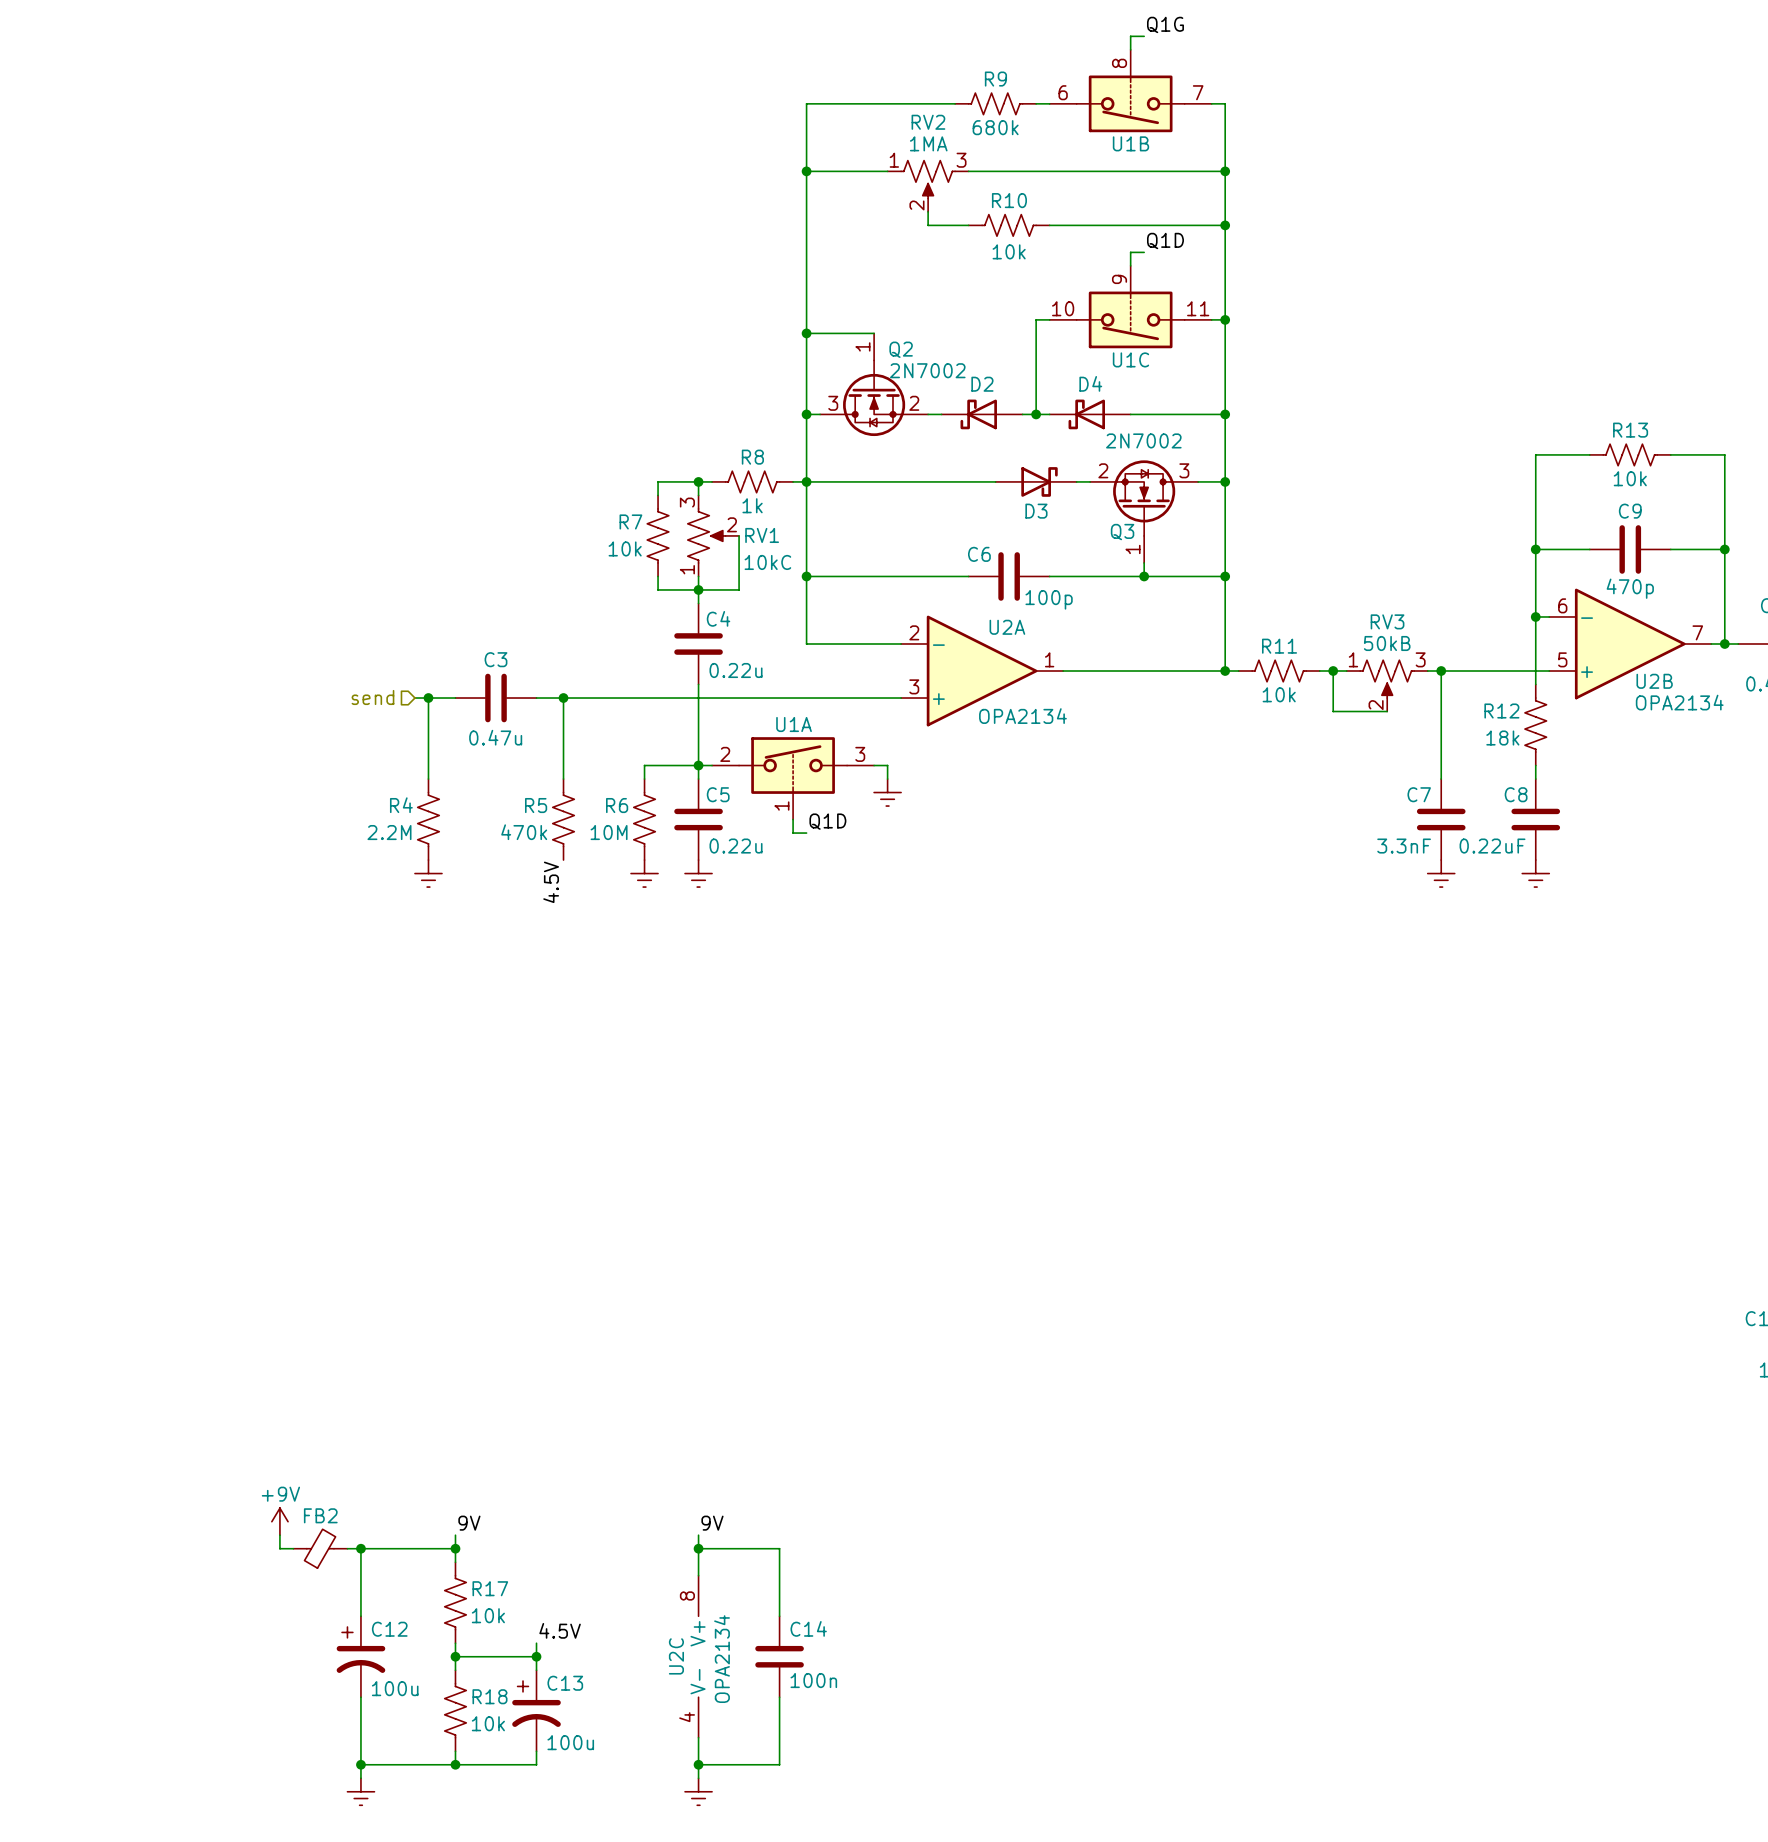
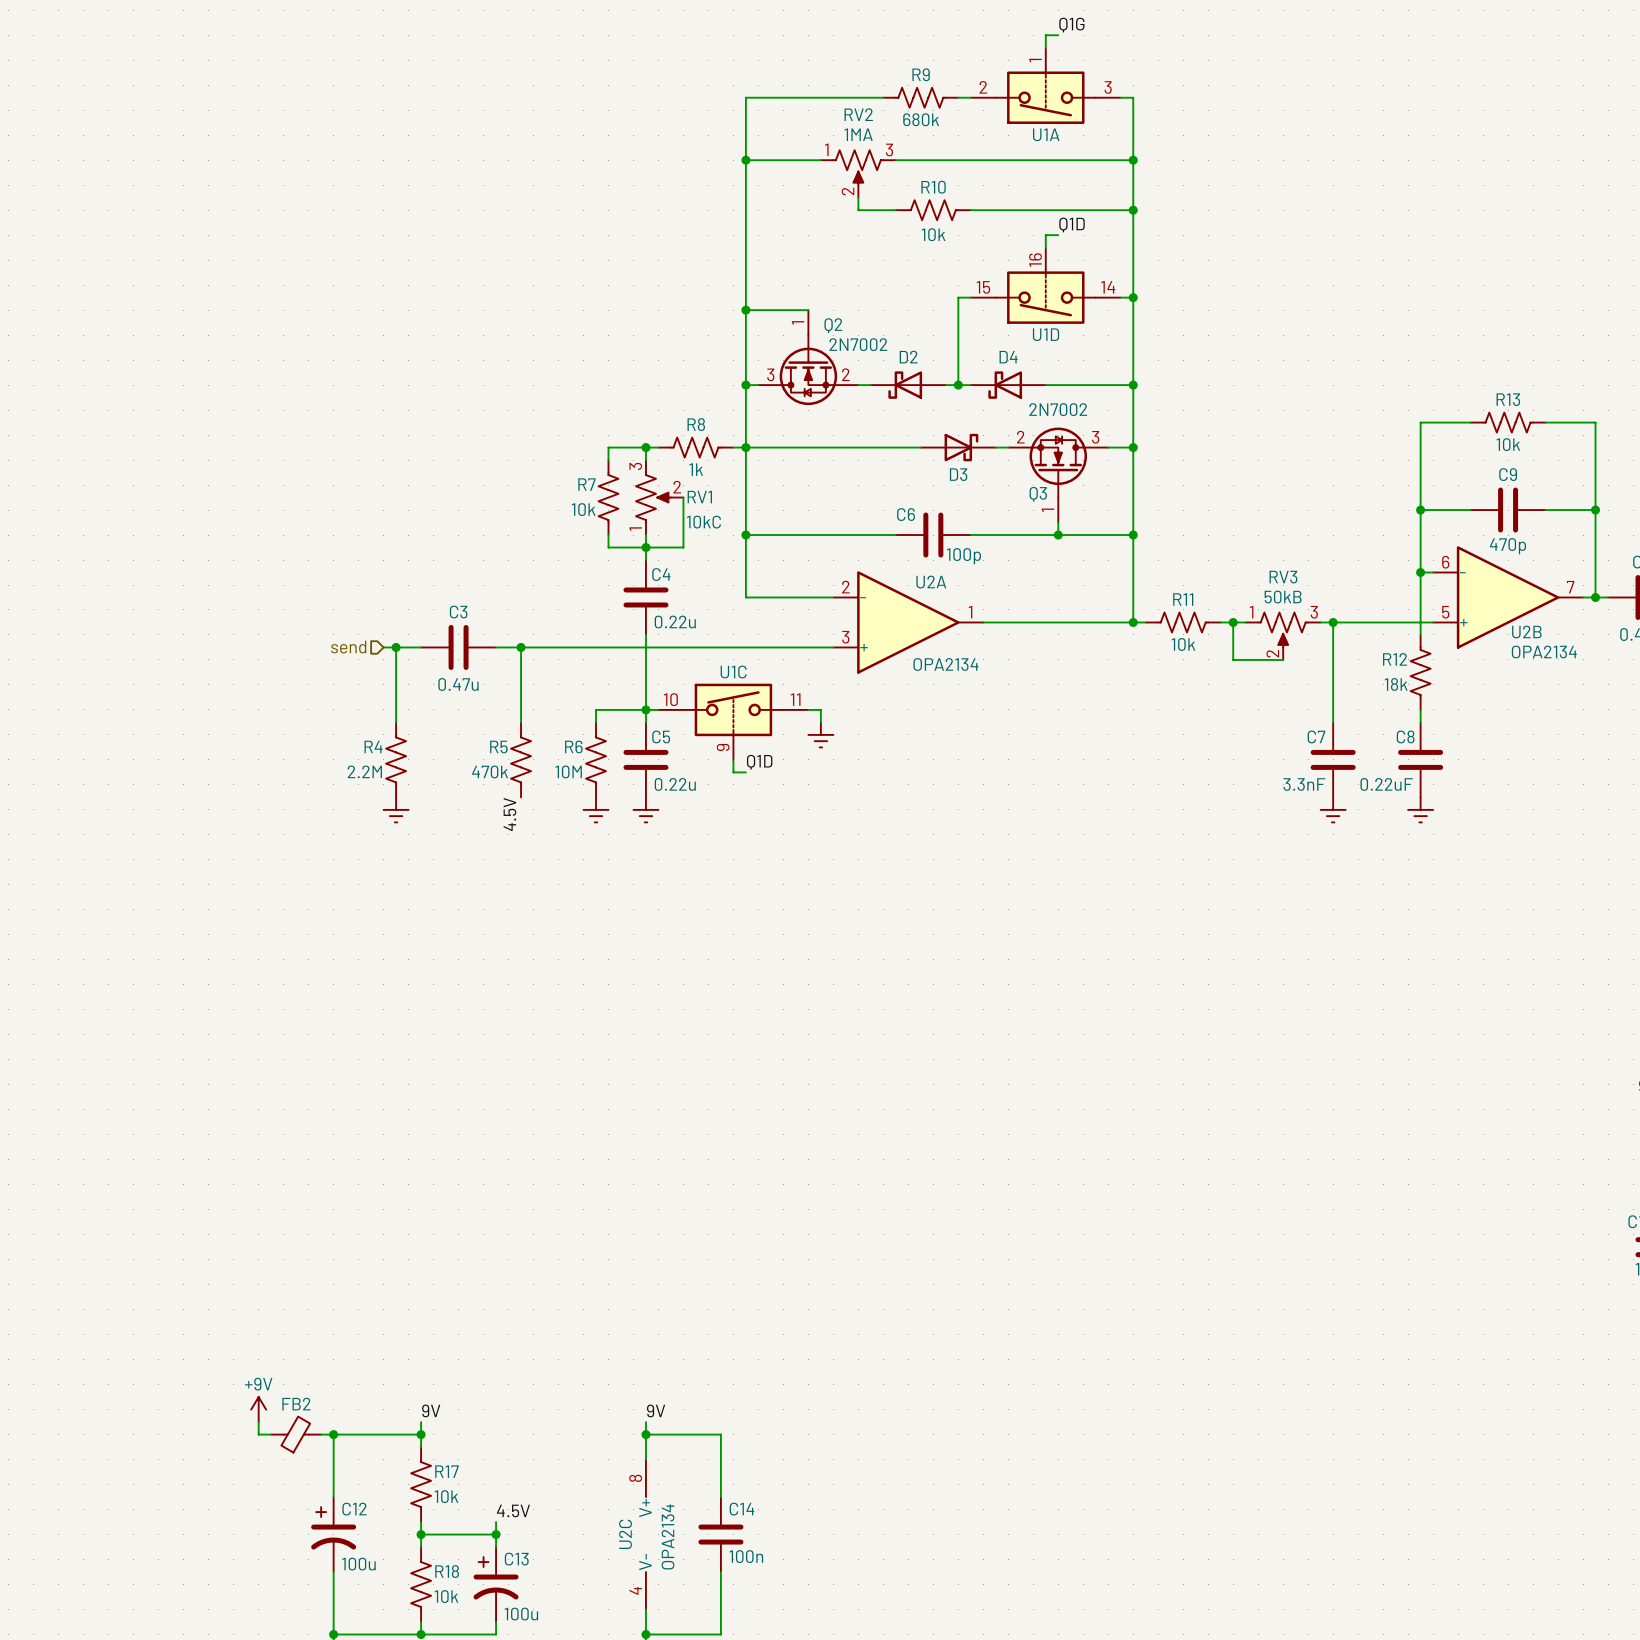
U1B: (1130, 91) -> none
U1C position: (1130, 307) -> (733, 721)
U1D: none -> (1045, 285)
U1C flip: as is (1130, 319) -> up-down (733, 709)
U1A flip: as is (793, 765) -> up-down (1045, 97)
U1A position: (793, 778) -> (1045, 85)

